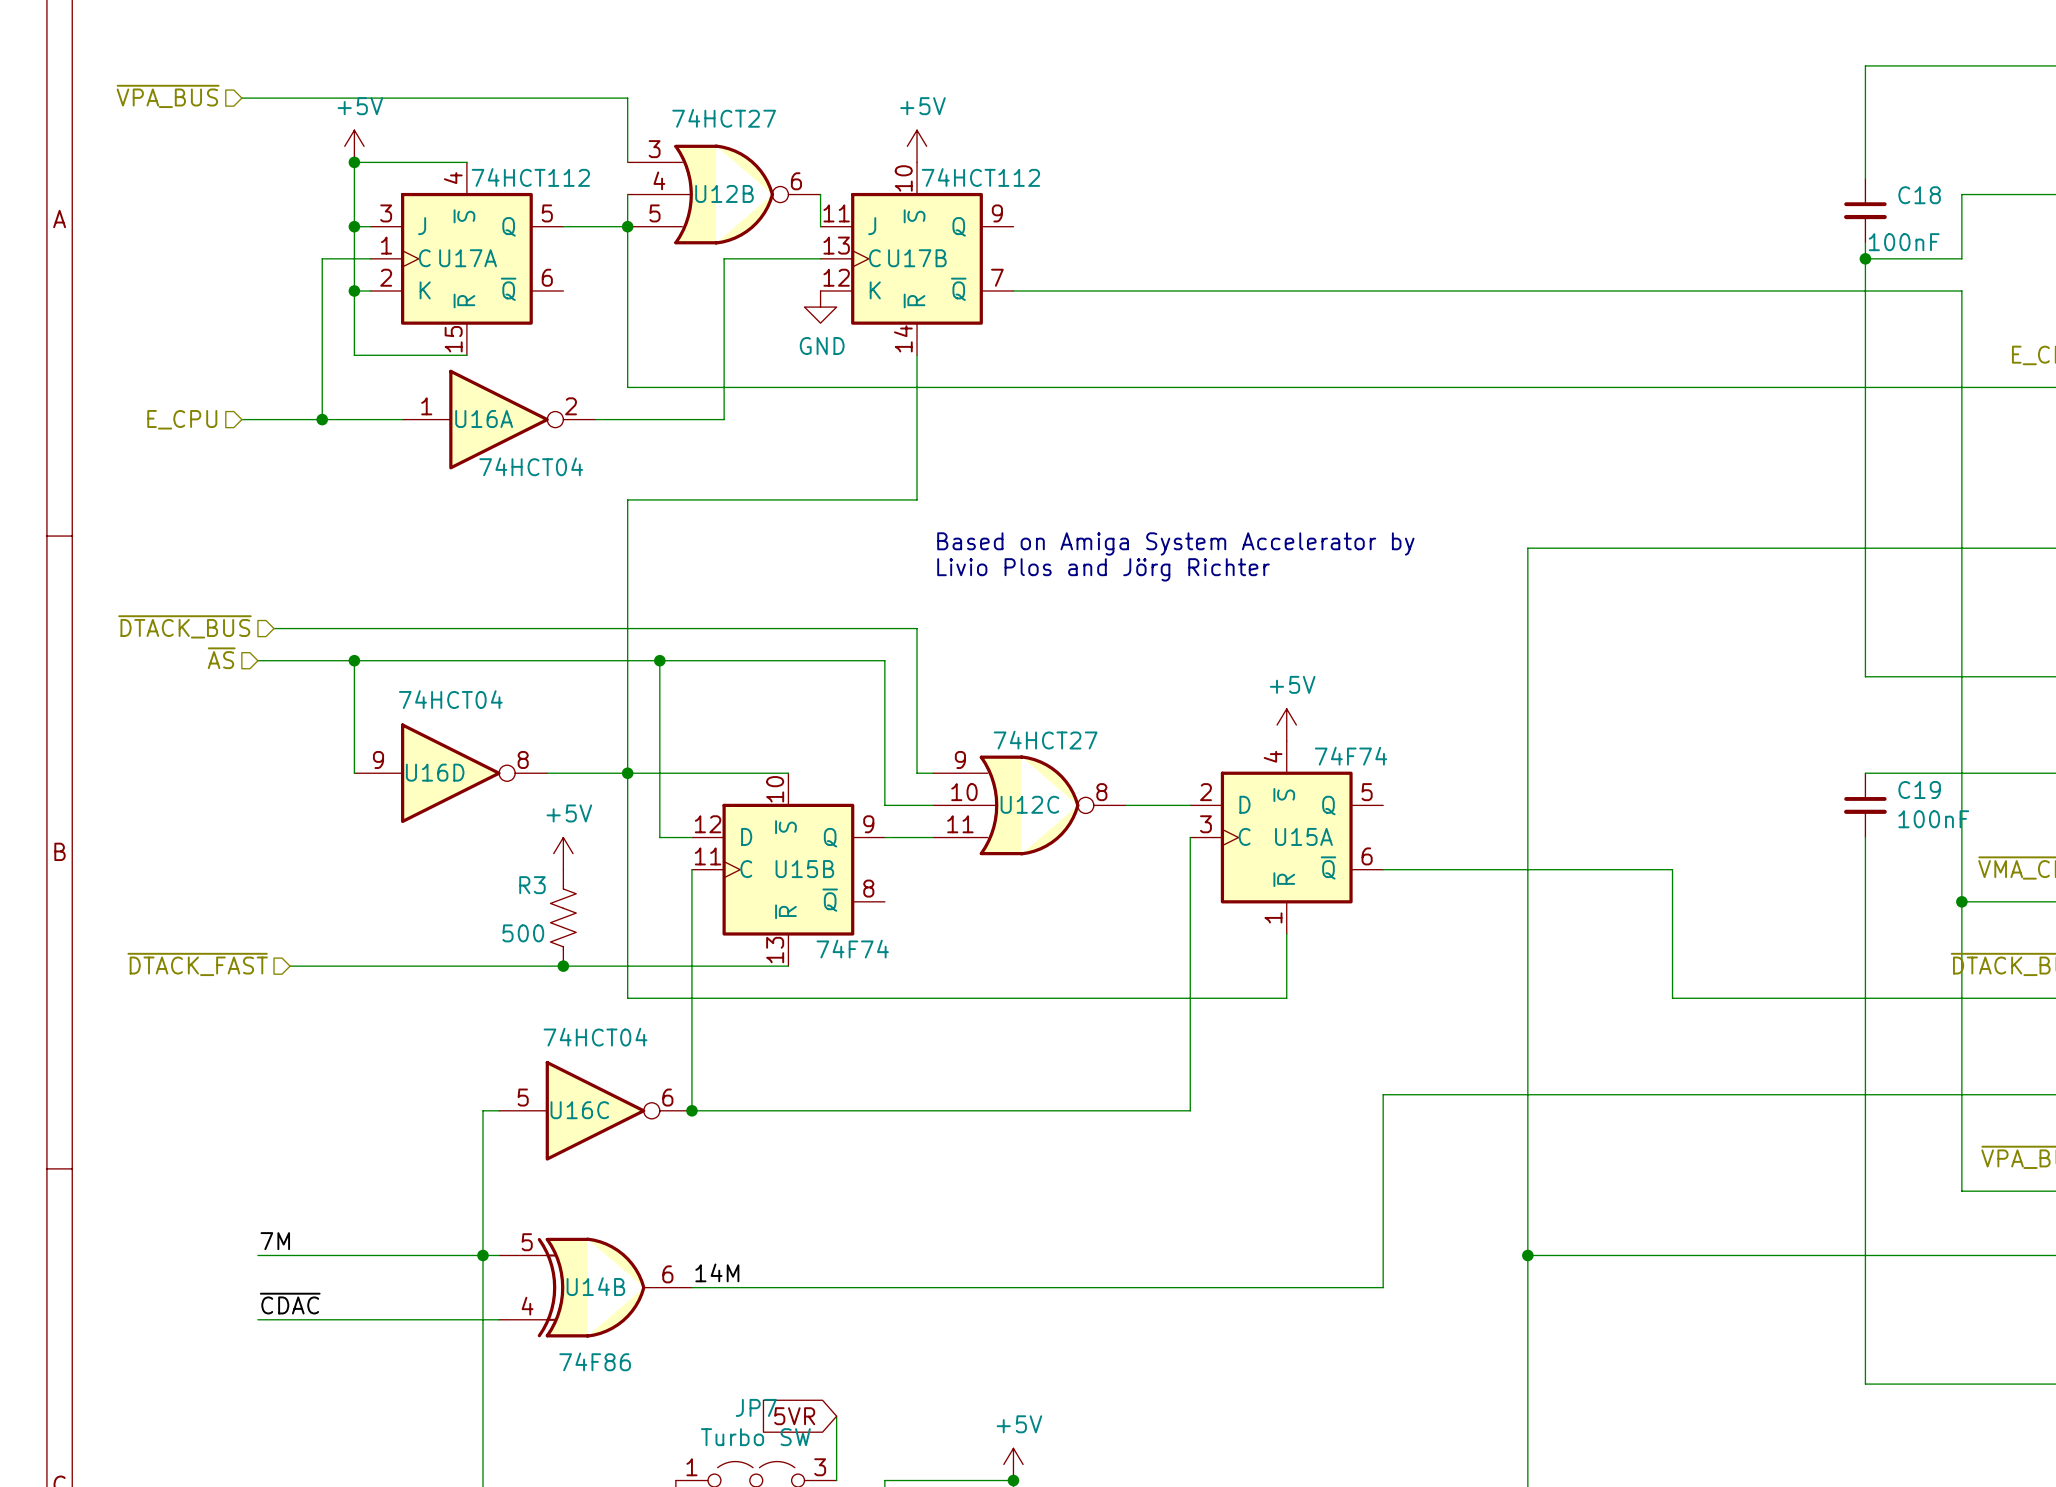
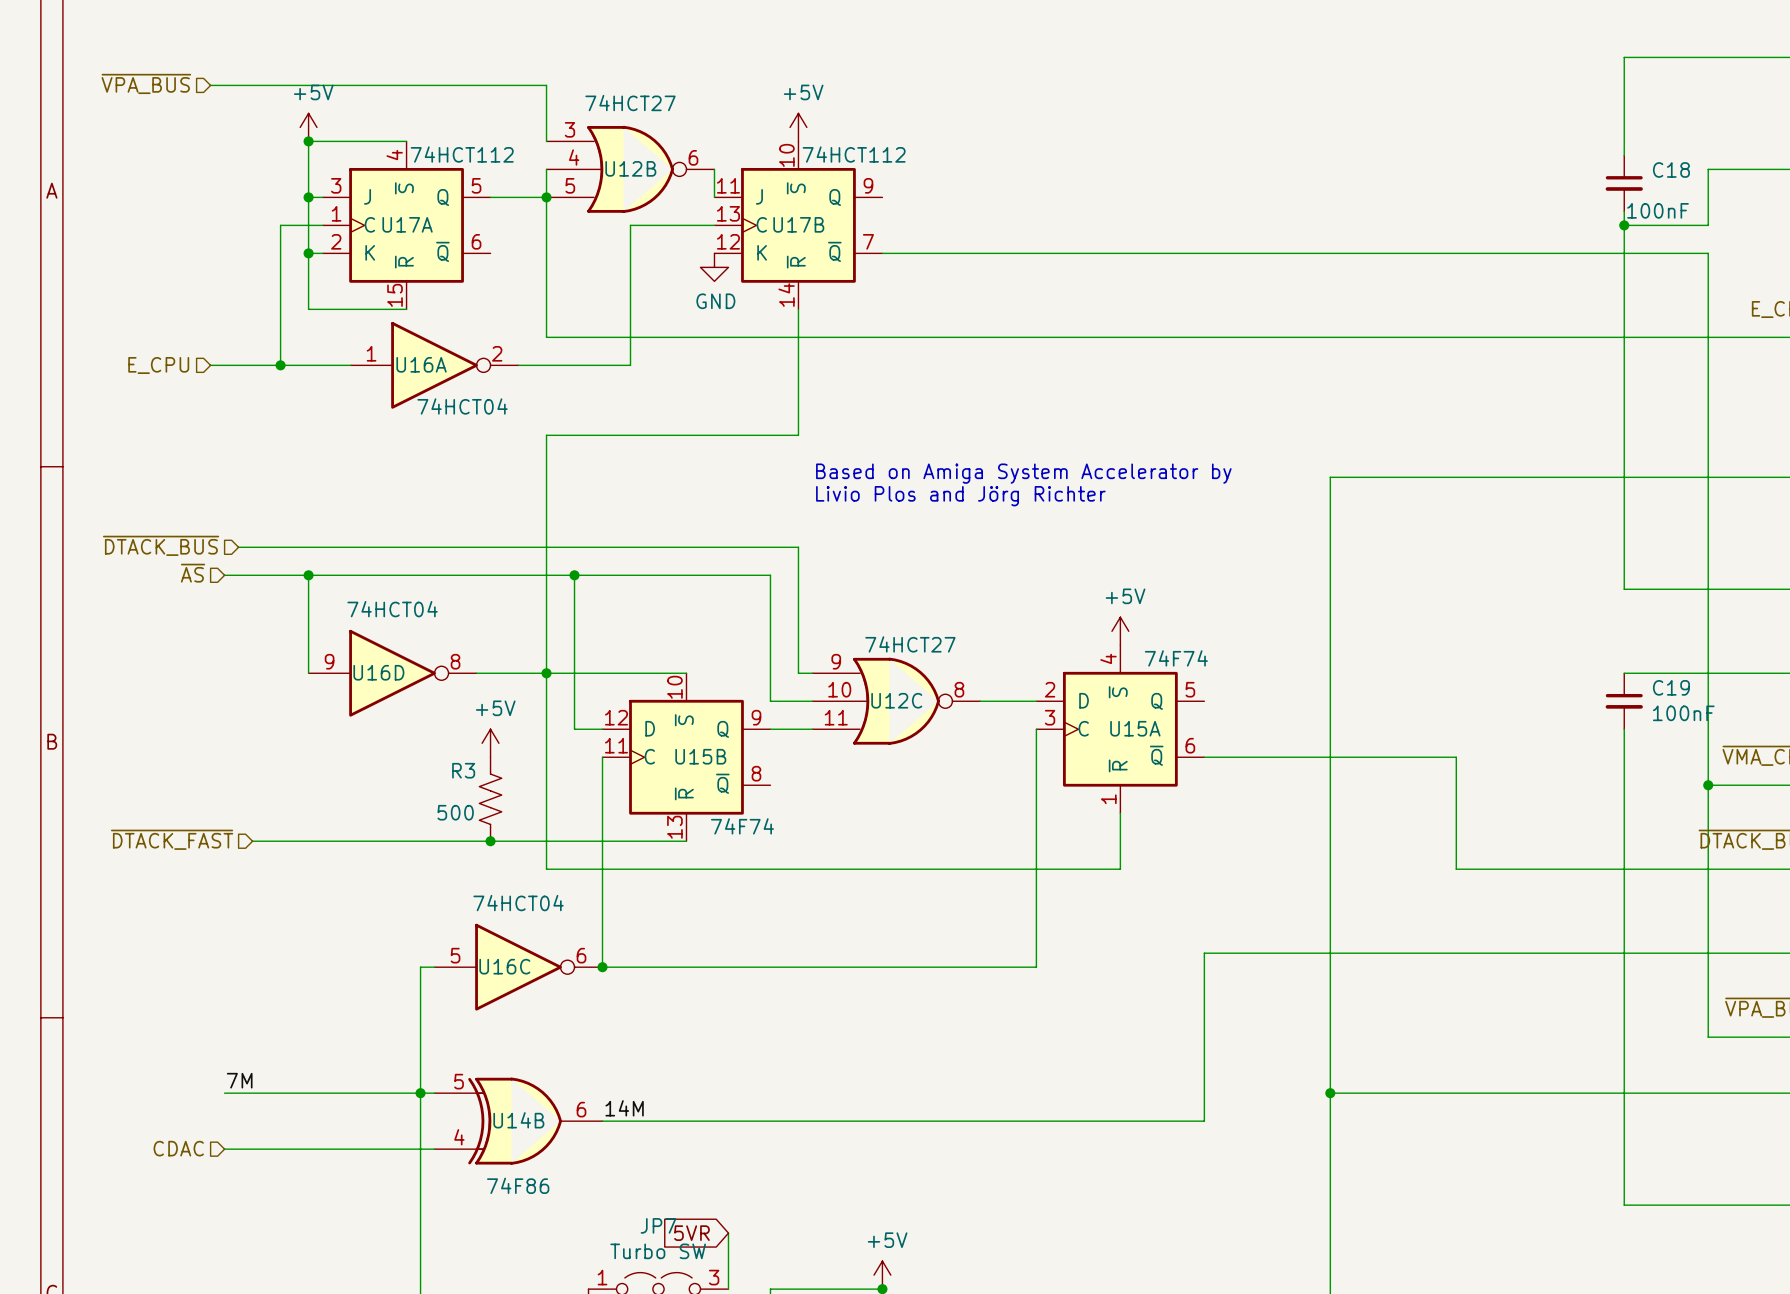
label: ~{CDAC} (290, 1303) -> none
hierarchical label: none -> CDAC (178, 1148)

